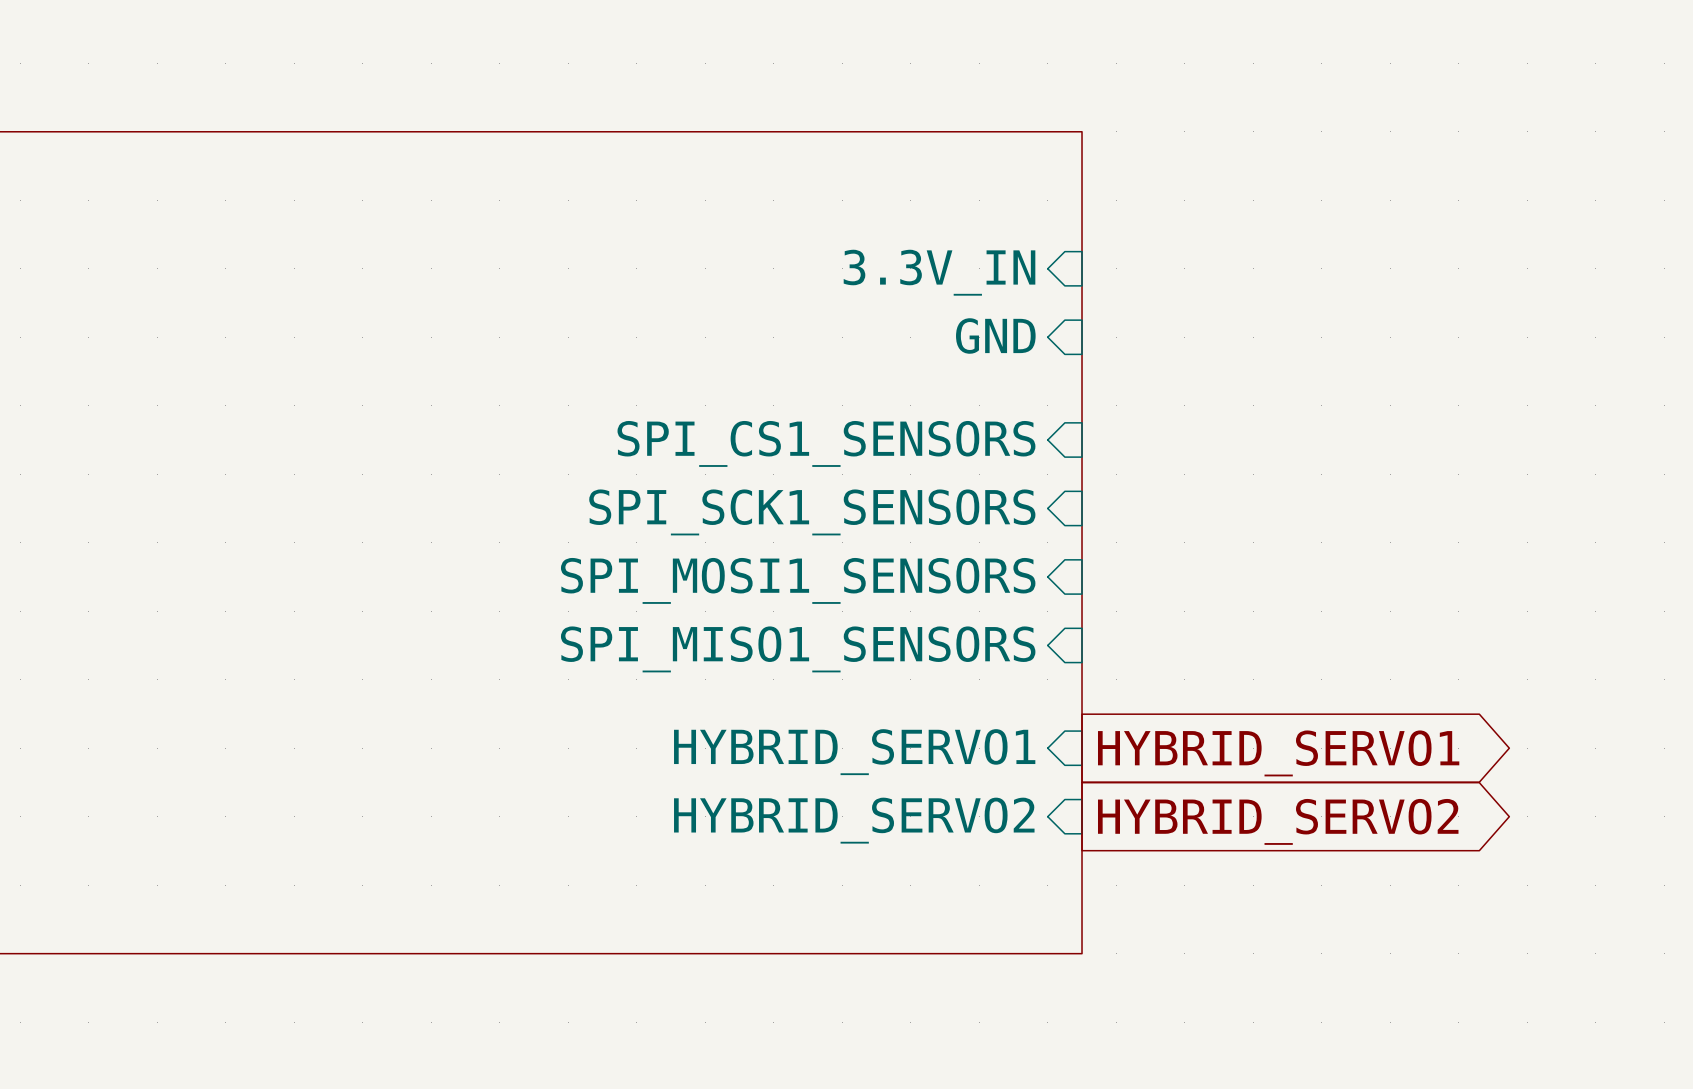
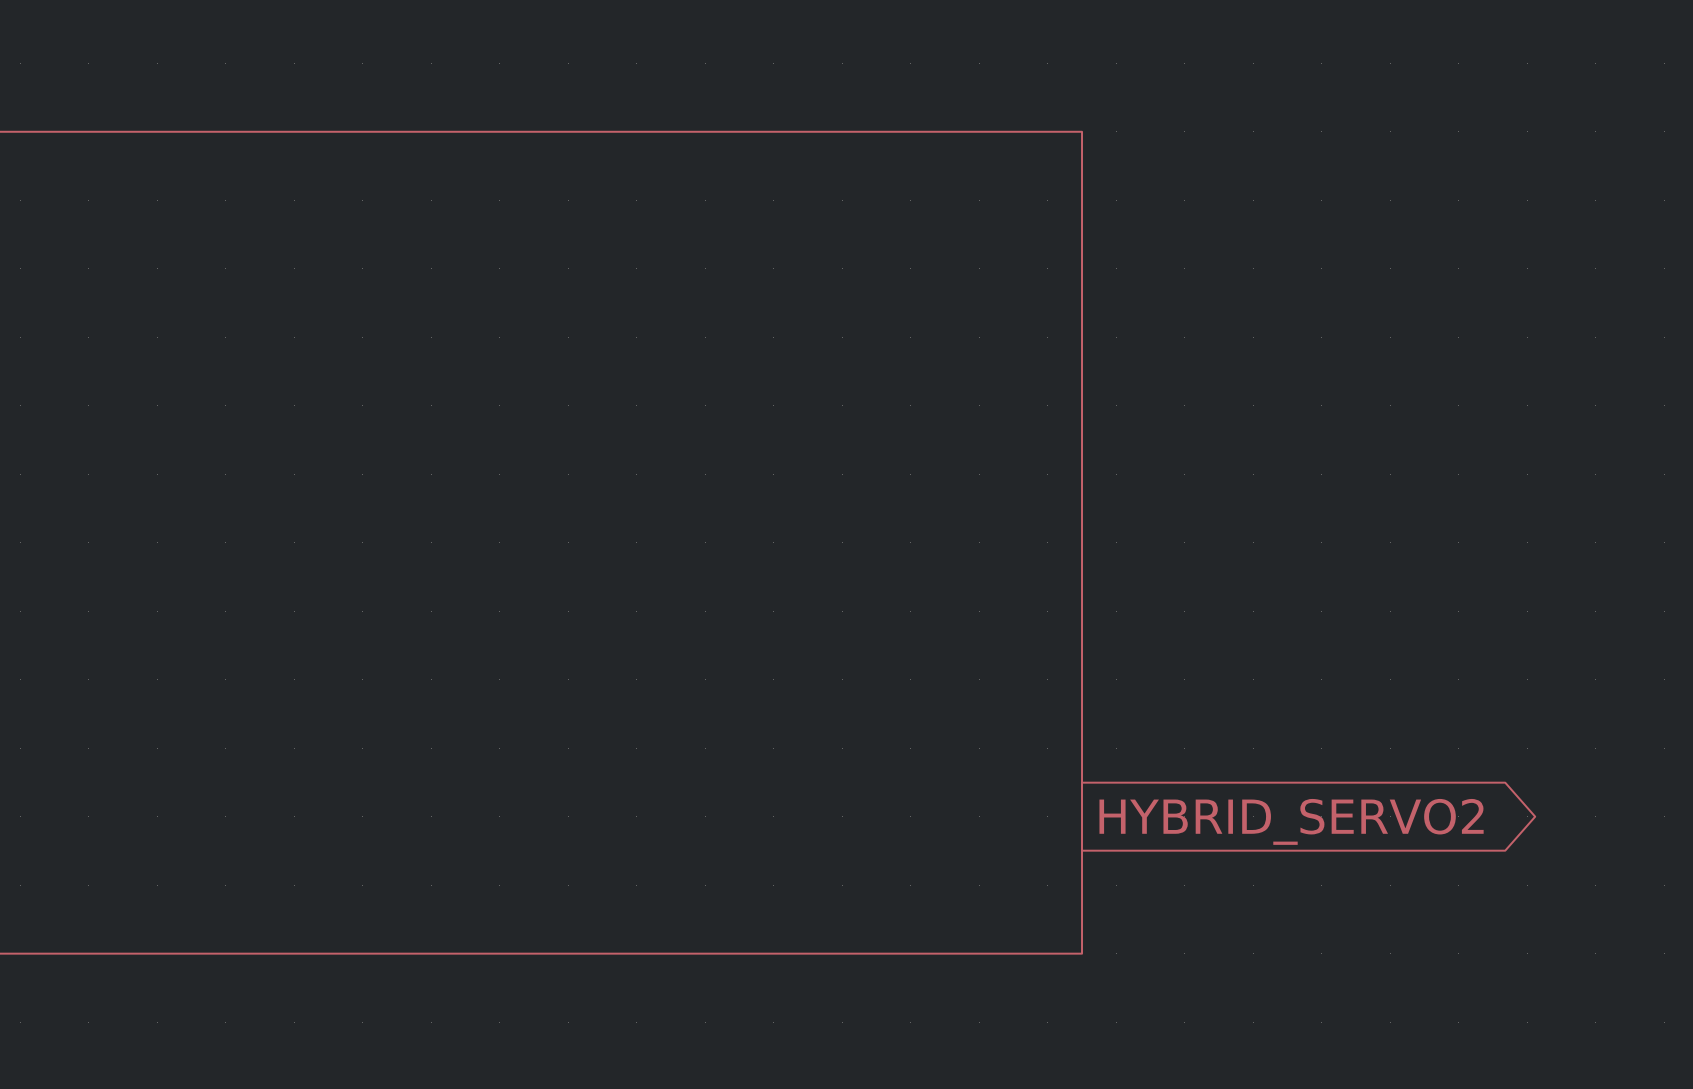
sheet pin: 3.3V_IN (939, 272) -> none
sheet pin: GND (995, 335) -> none
sheet pin: SPI_CS1_SENSORS (826, 443) -> none
sheet pin: SPI_SCK1_SENSORS (812, 512) -> none
sheet pin: SPI_MOSI1_SENSORS (798, 580) -> none
sheet pin: SPI_MISO1_SENSORS (798, 649) -> none
sheet pin: HYBRID_SERVO1 (854, 752) -> none
global label: HYBRID_SERVO1 (1278, 753) -> none
sheet pin: HYBRID_SERVO2 (854, 820) -> none

